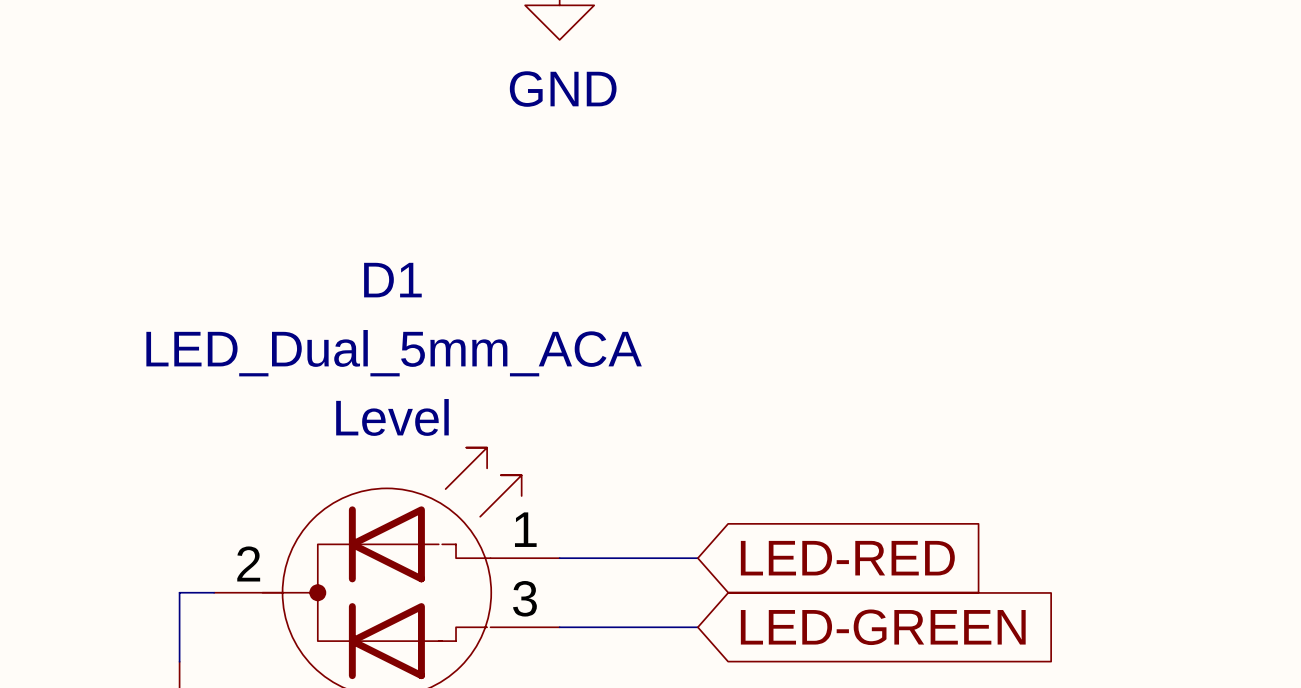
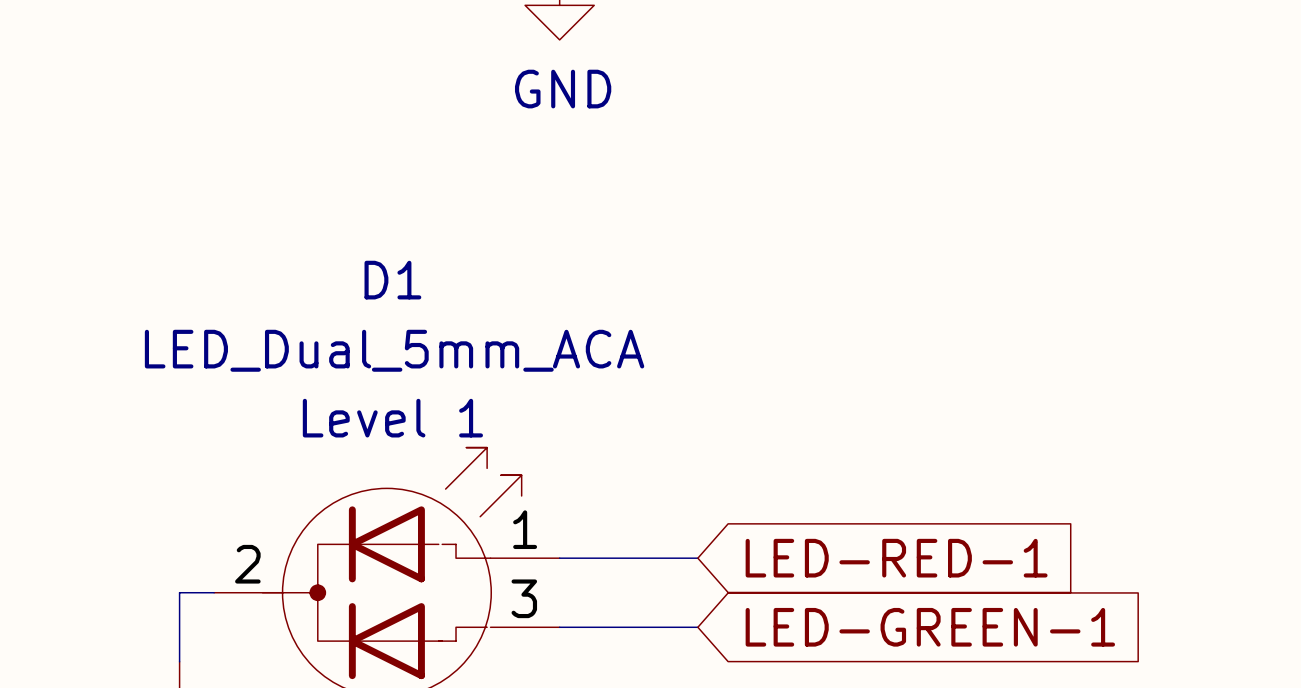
D1 text: Level (392, 417) -> Level 1 (392, 418)
global label: LED-RED (847, 558) -> LED-RED-1 (896, 558)
global label: LED-GREEN (883, 627) -> LED-GREEN-1 (930, 627)

